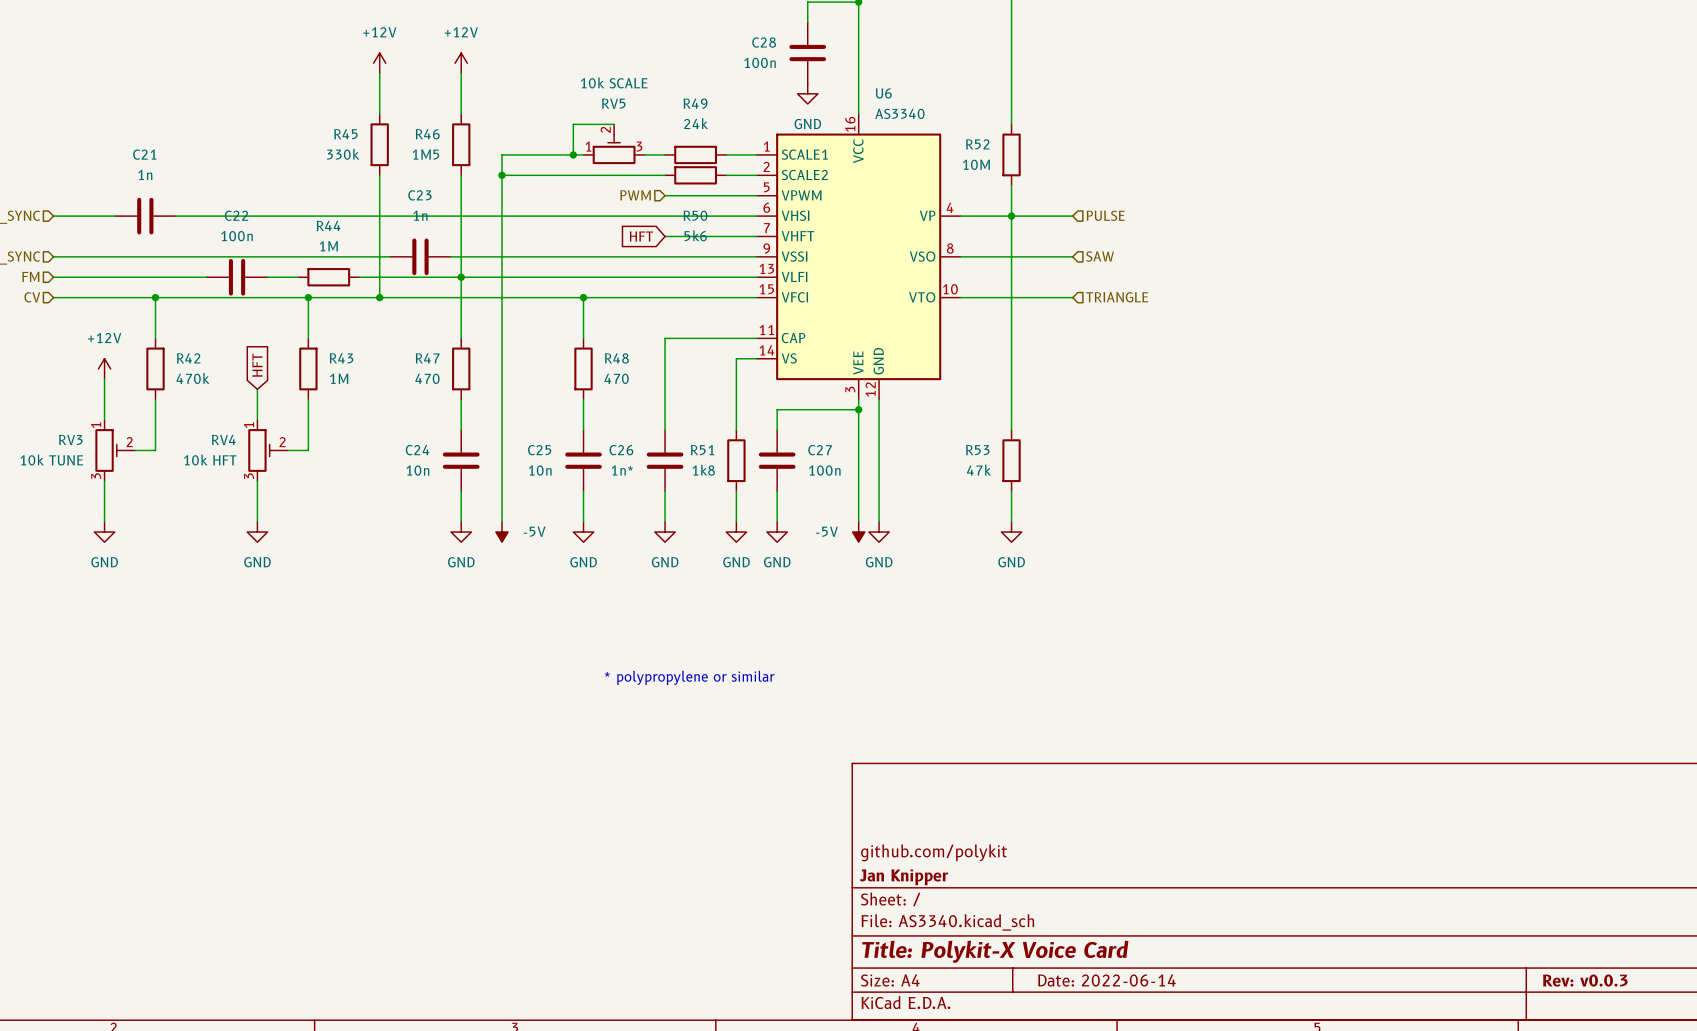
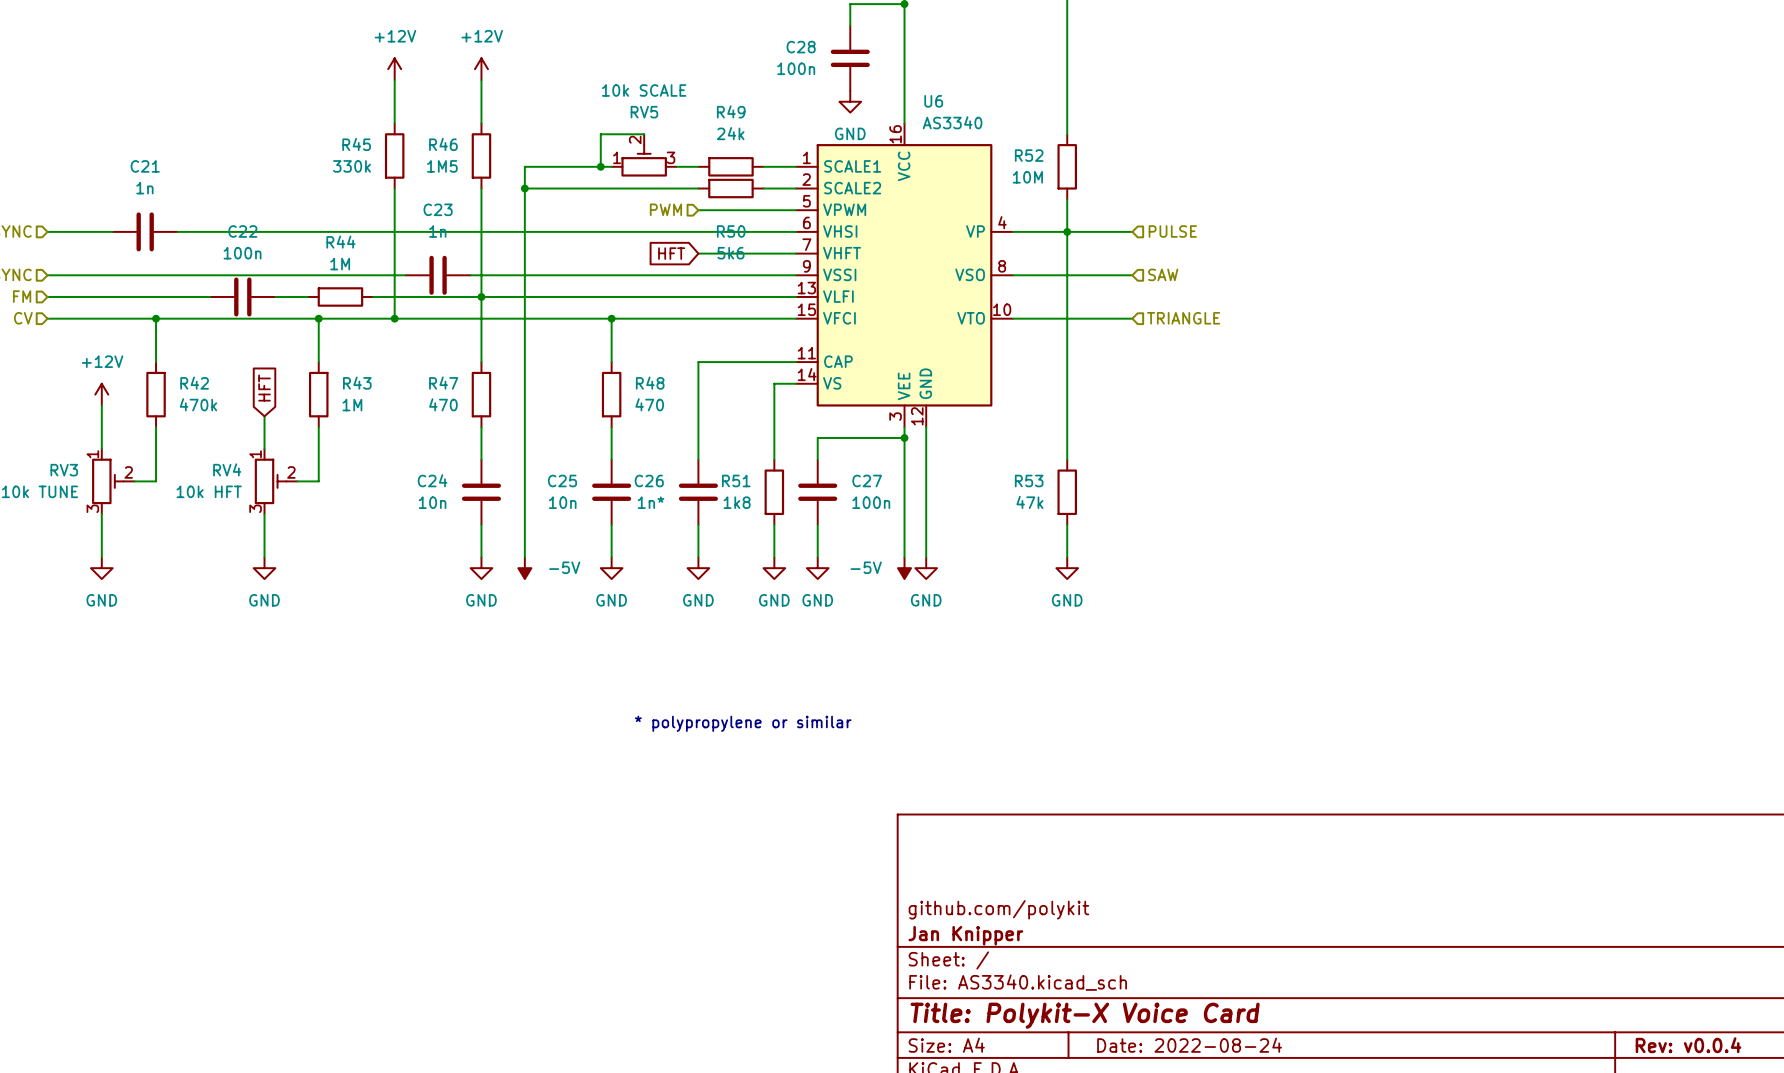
title block: Date: 2022-06-14 (1106, 980) -> Date: 2022-08-24 (1189, 1045)
title block: Rev: v0.0.3 (1585, 980) -> Rev: v0.0.4 (1688, 1045)

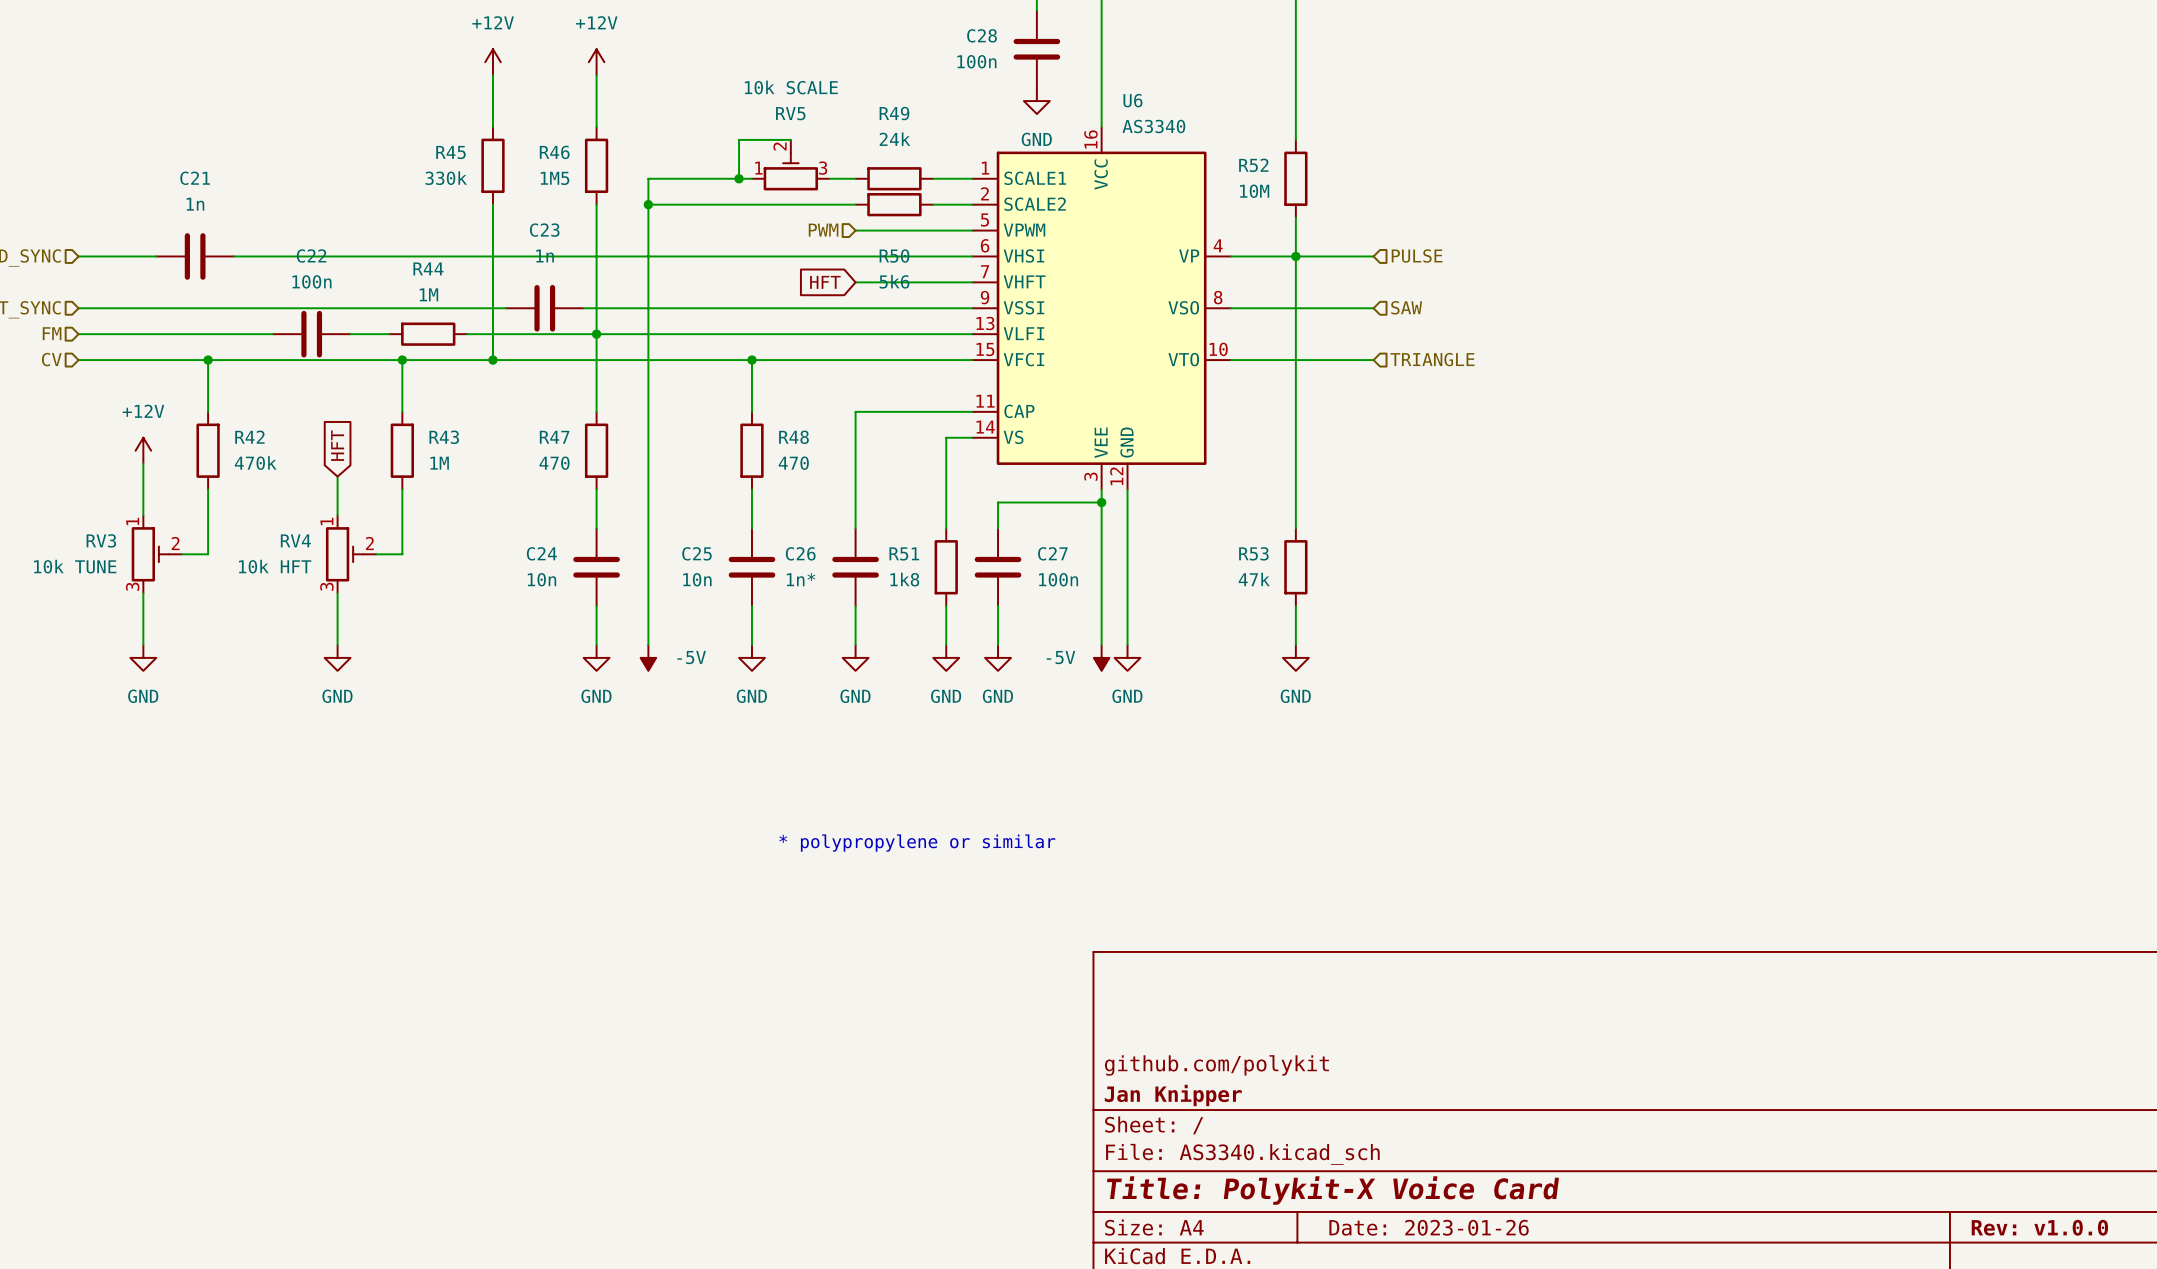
title block: Date: 2022-08-24 (1189, 1045) -> Date: 2023-01-26 (1429, 1227)
title block: Rev: v0.0.4 (1688, 1045) -> Rev: v1.0.0 (2039, 1227)

